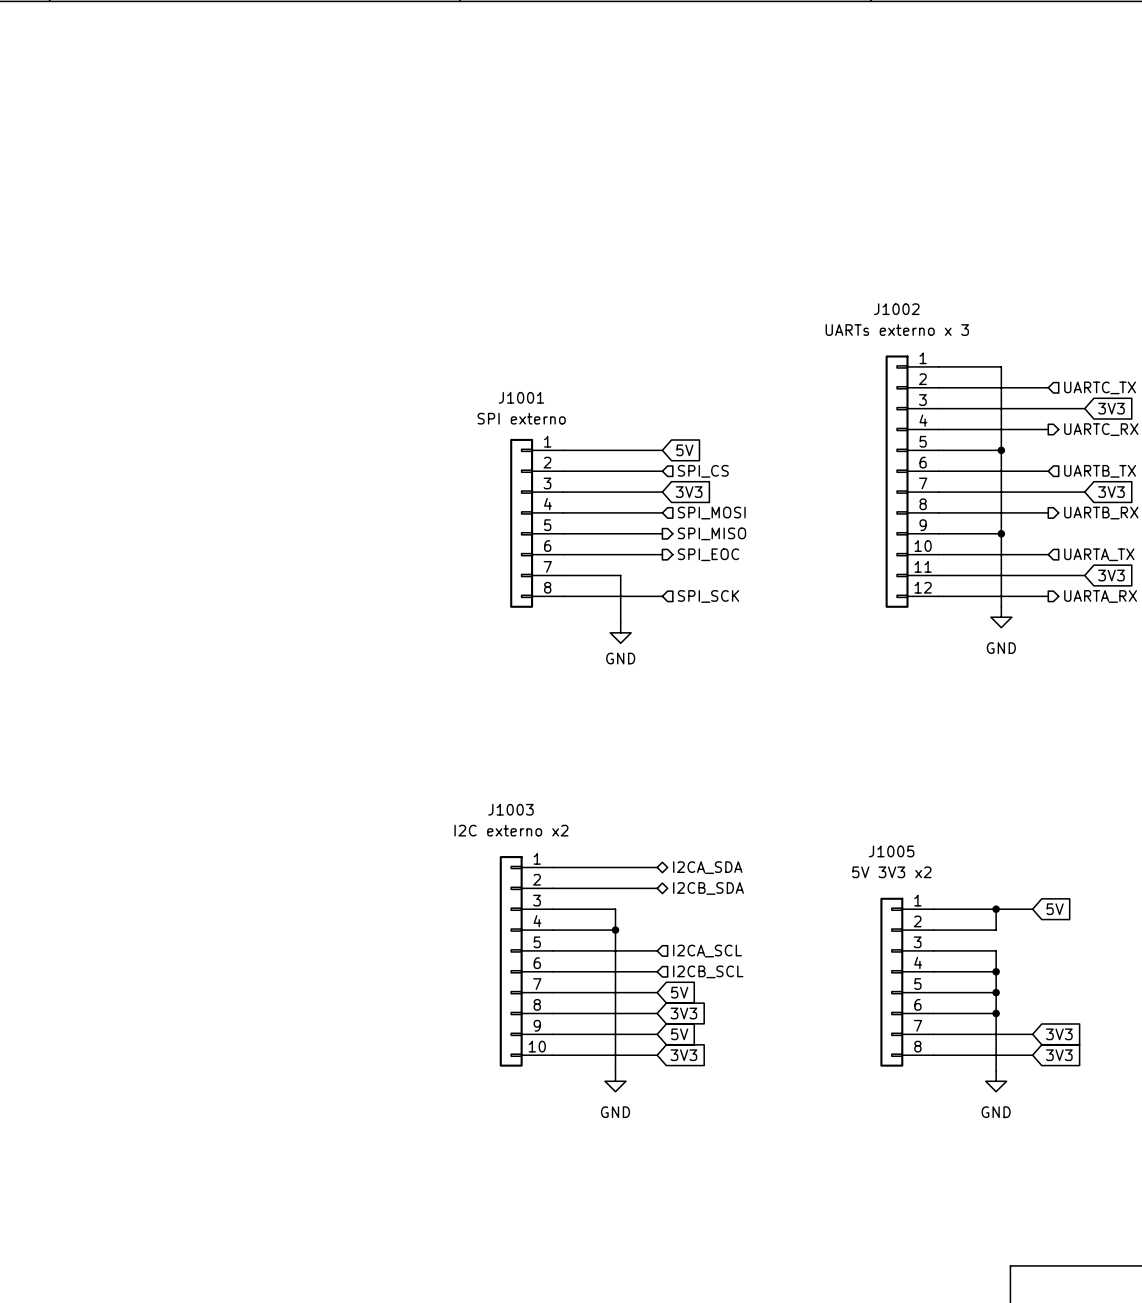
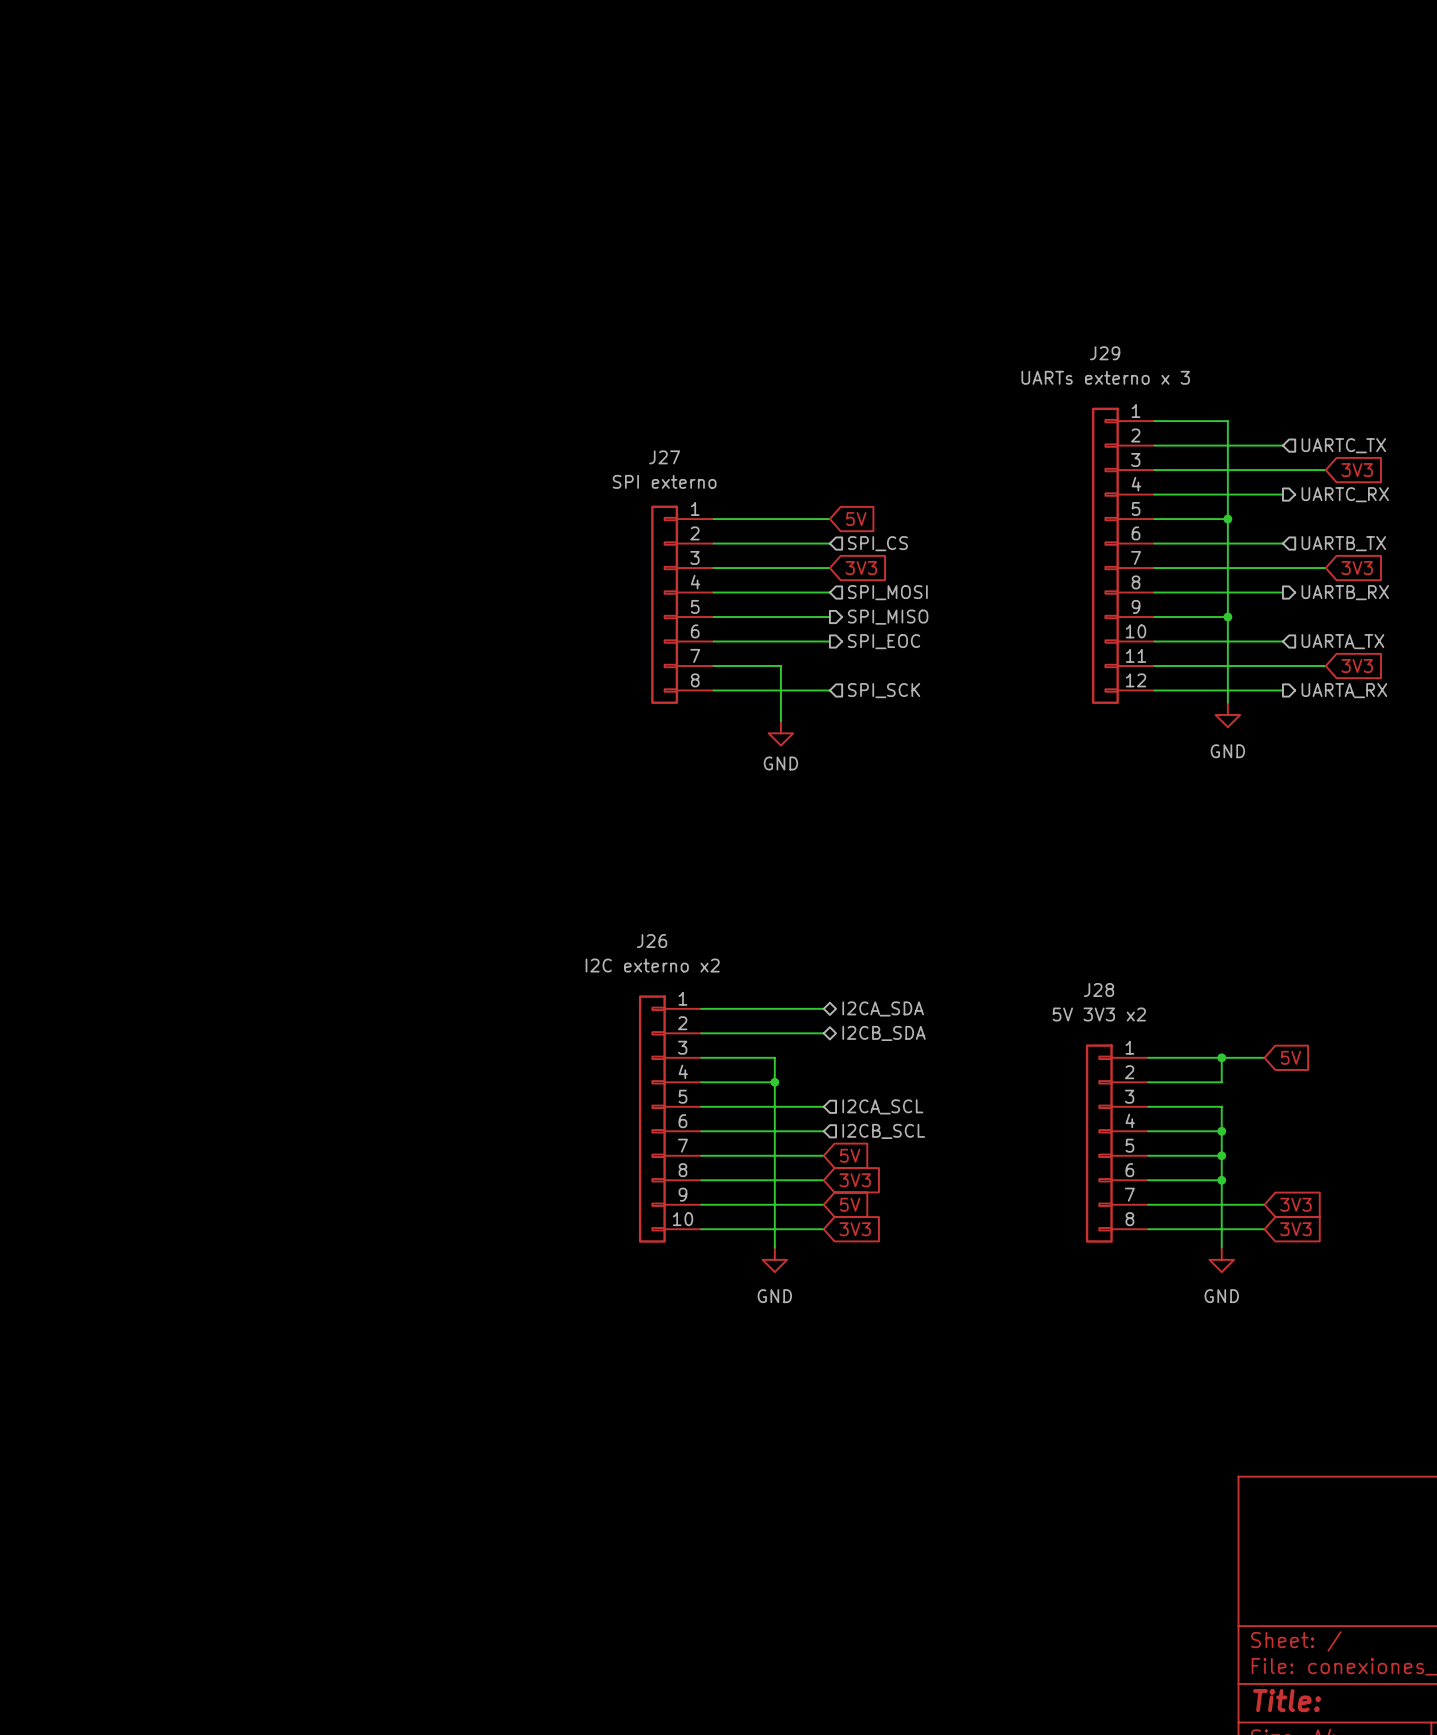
J1002 name: J1002 (896, 309) -> J29 (1105, 353)
J1001 name: J1001 (521, 397) -> J27 (664, 457)
J1003 name: J1003 (510, 809) -> J26 (652, 941)
J1005 name: J1005 (891, 851) -> J28 (1099, 990)

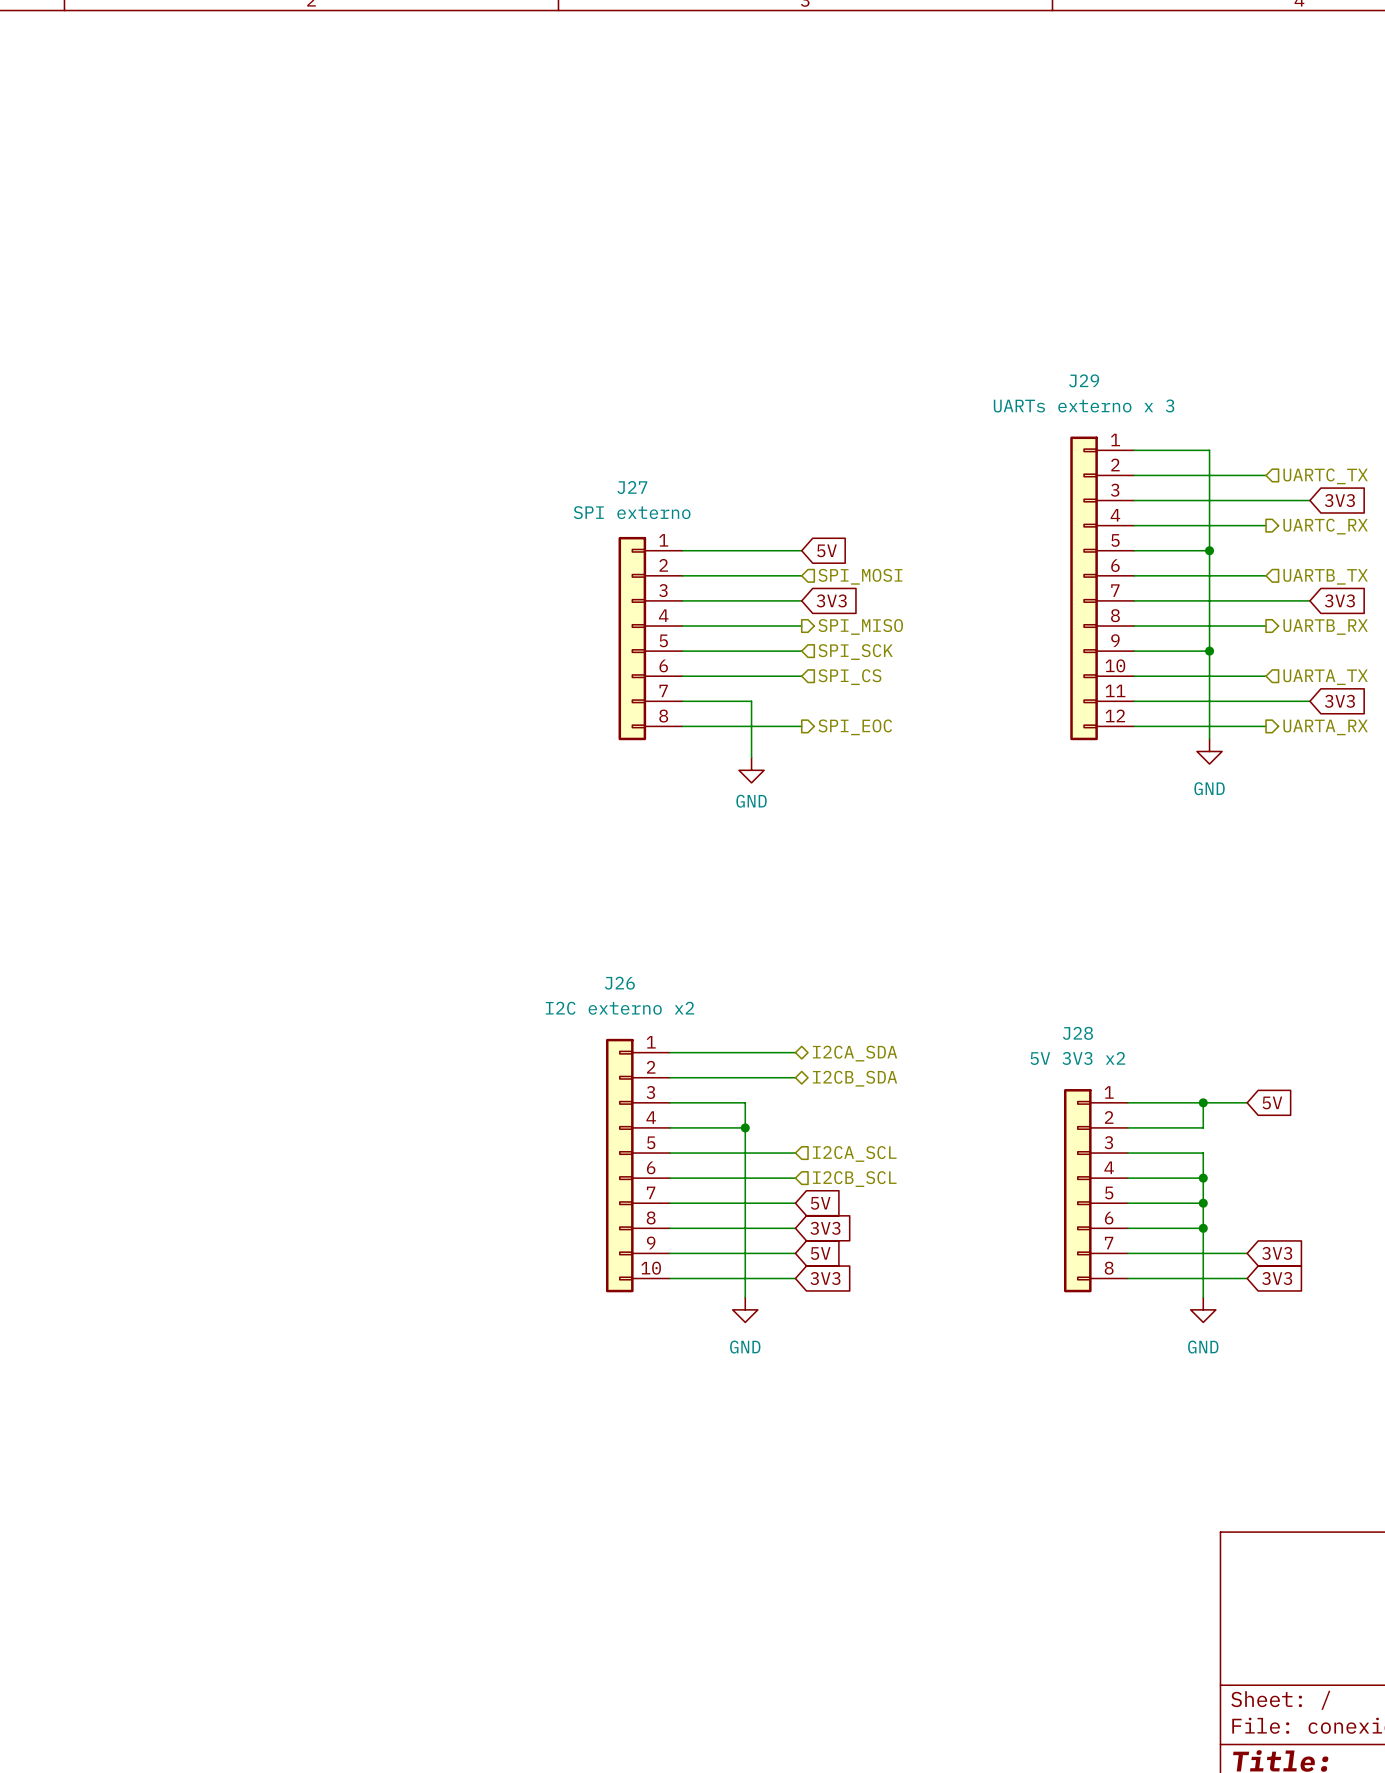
hierarchical label: SPI_CS (877, 543) -> SPI_MOSI (860, 576)
hierarchical label shape: input (887, 592) -> output (860, 626)
hierarchical label: SPI_MOSI (887, 592) -> SPI_MISO (860, 626)
hierarchical label shape: output (888, 617) -> input (855, 652)
hierarchical label: SPI_MISO (888, 617) -> SPI_SCK (855, 652)
hierarchical label shape: output (884, 641) -> input (849, 677)
hierarchical label: SPI_EOC (884, 641) -> SPI_CS (849, 677)
hierarchical label shape: input (884, 690) -> output (855, 727)
hierarchical label: SPI_SCK (884, 690) -> SPI_EOC (855, 727)

